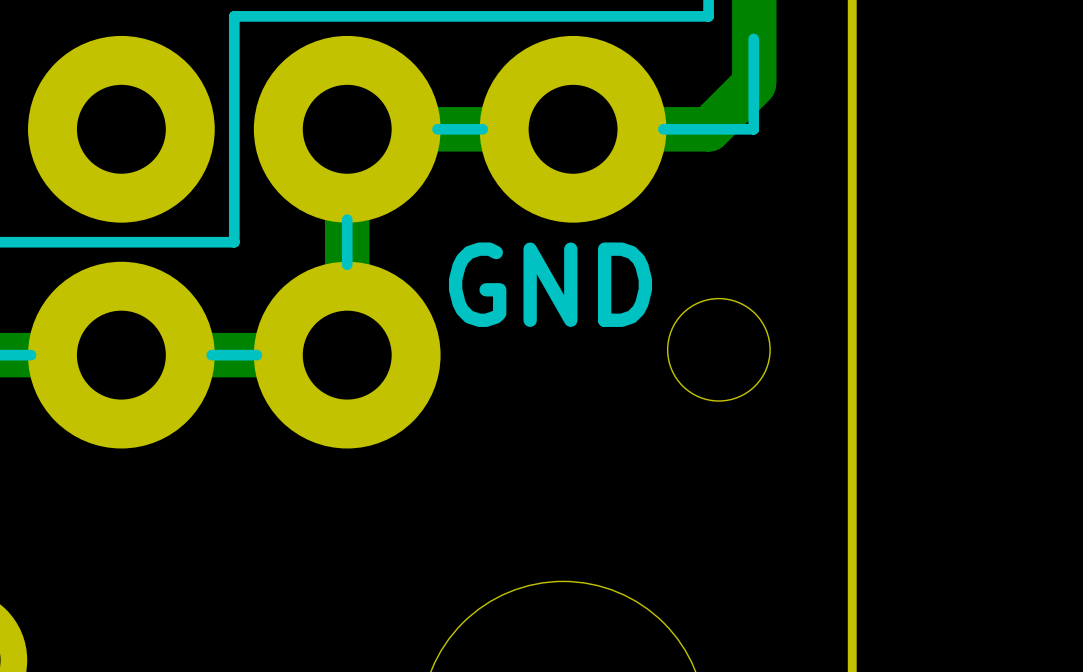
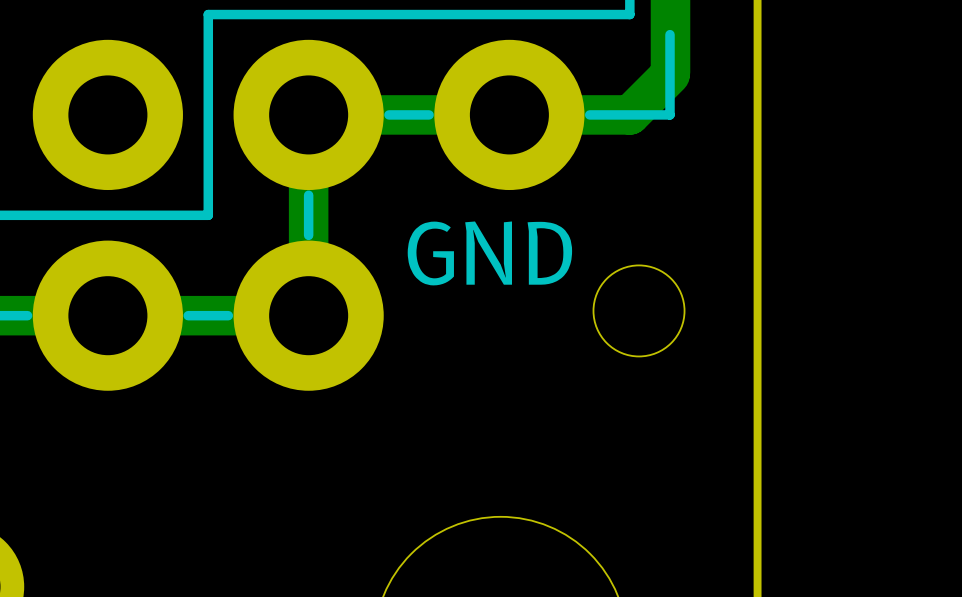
part footprint: [28, 35, 215, 223] -> [32, 39, 183, 191]
part footprint: [253, 35, 441, 223] -> [233, 39, 384, 191]
part footprint: [479, 35, 667, 223] -> [434, 39, 585, 191]
part footprint: [28, 261, 215, 449] -> [32, 240, 183, 391]
part footprint: [253, 261, 441, 449] -> [233, 240, 384, 391]

